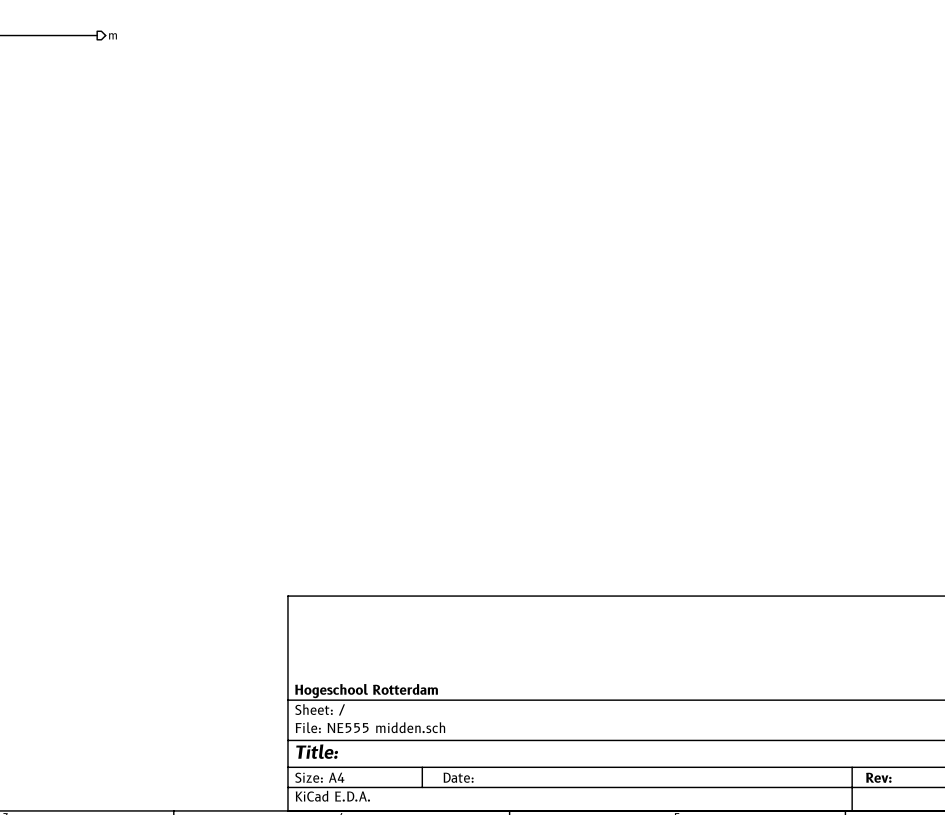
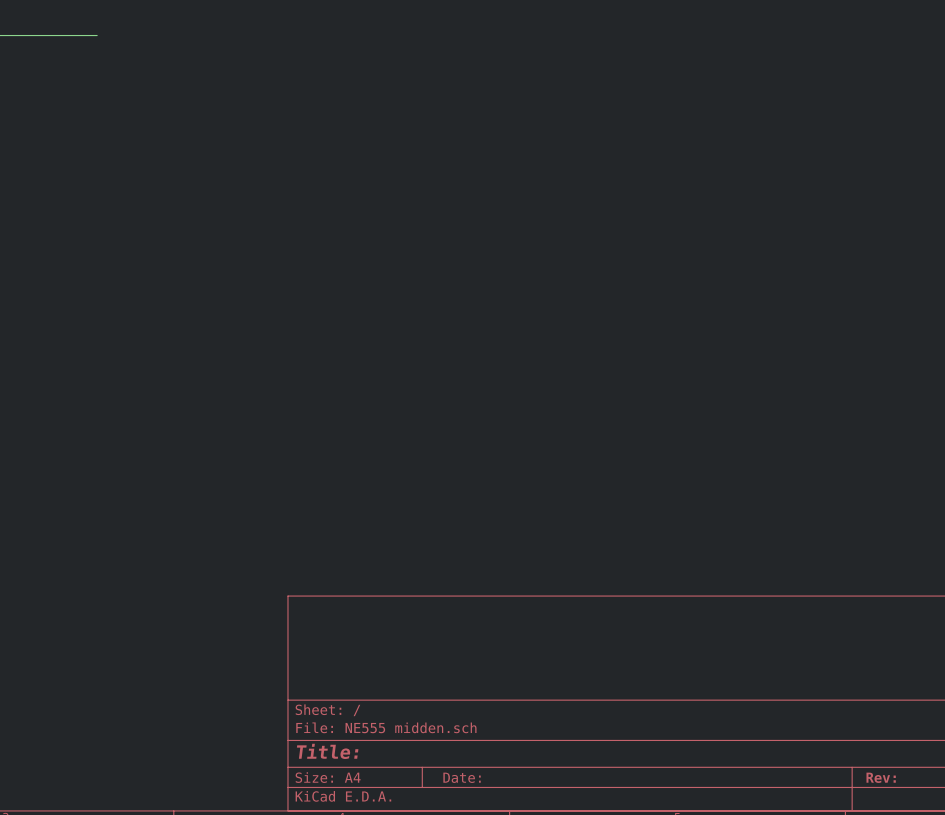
hierarchical label: m (113, 36) -> none
title block: Hogeschool Rotterdam (366, 691) -> none

